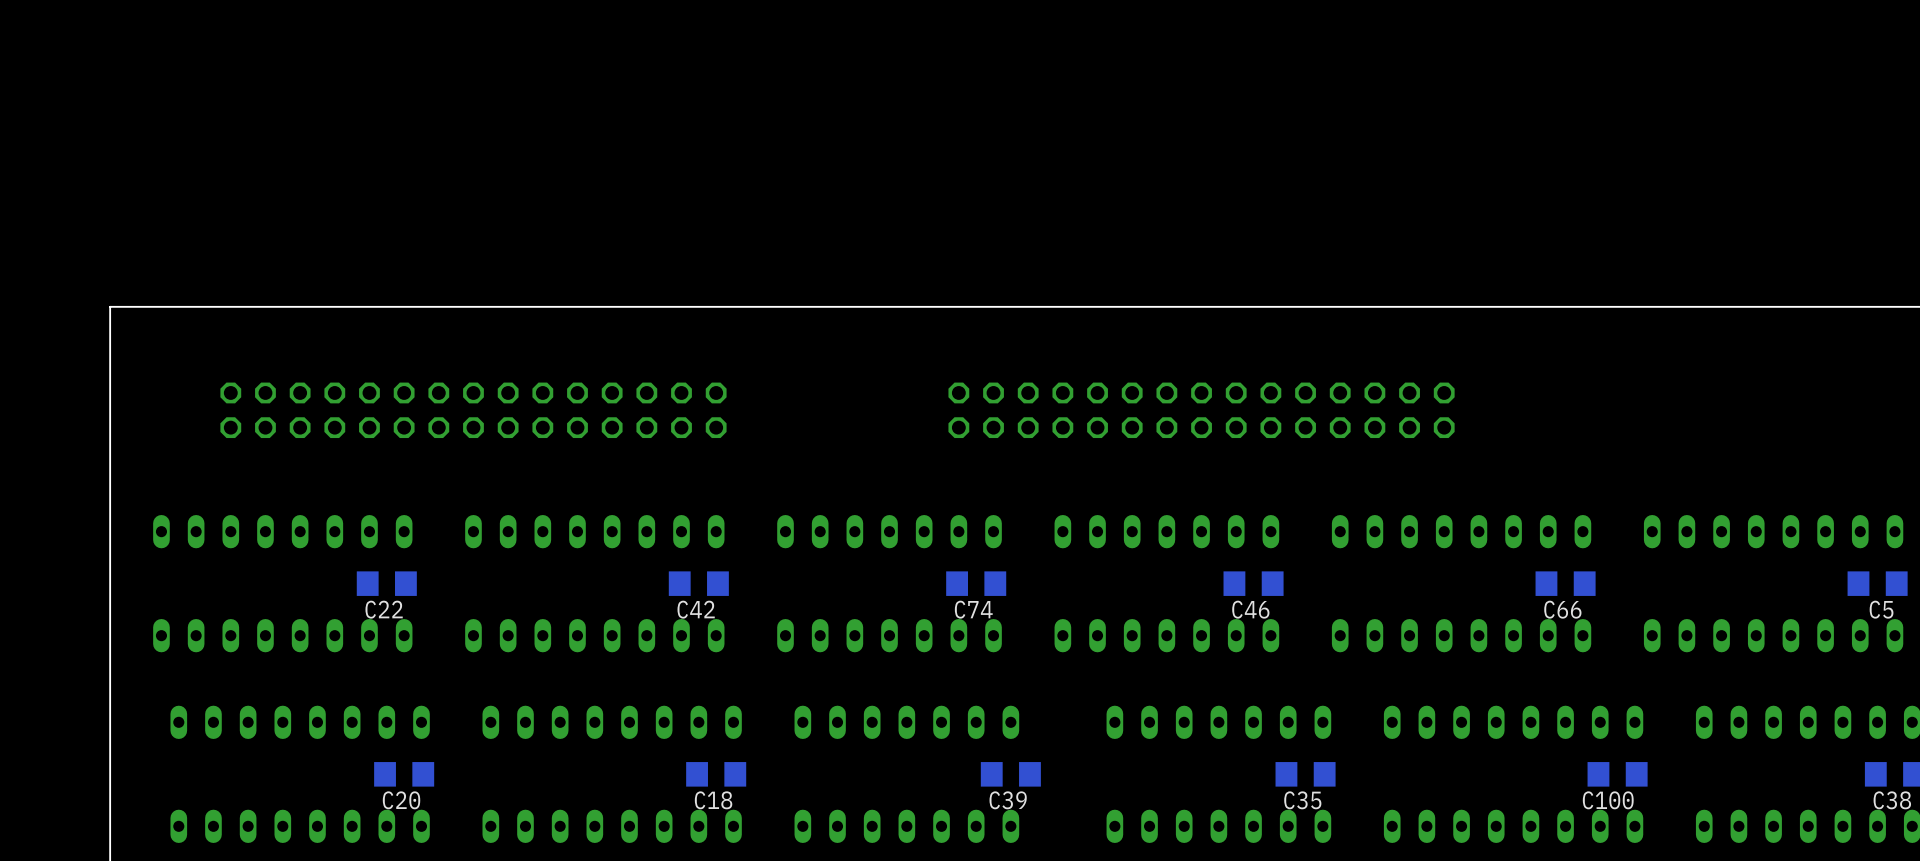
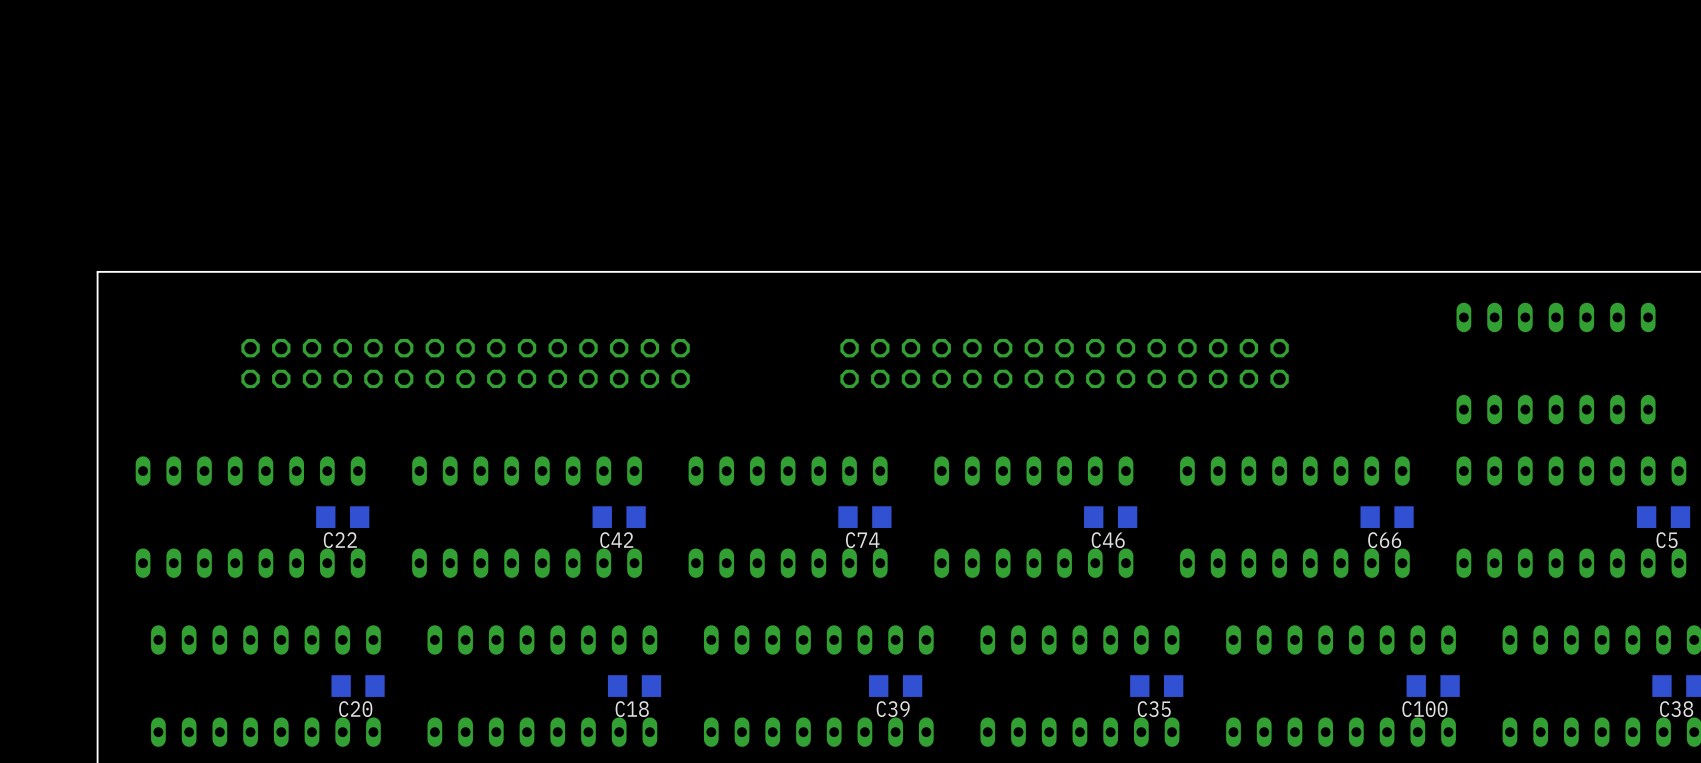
part position: (473, 410) -> (465, 363)
part: none -> (1556, 363)
part footprint: [794, 705, 1020, 843] -> [703, 625, 934, 747]

